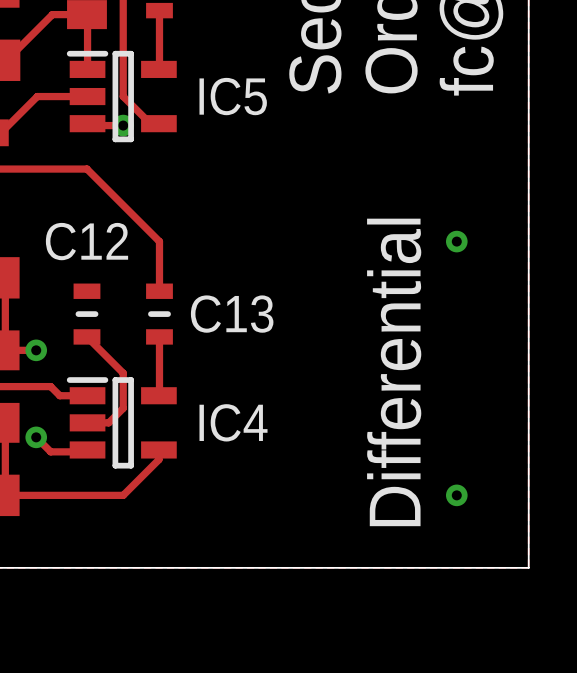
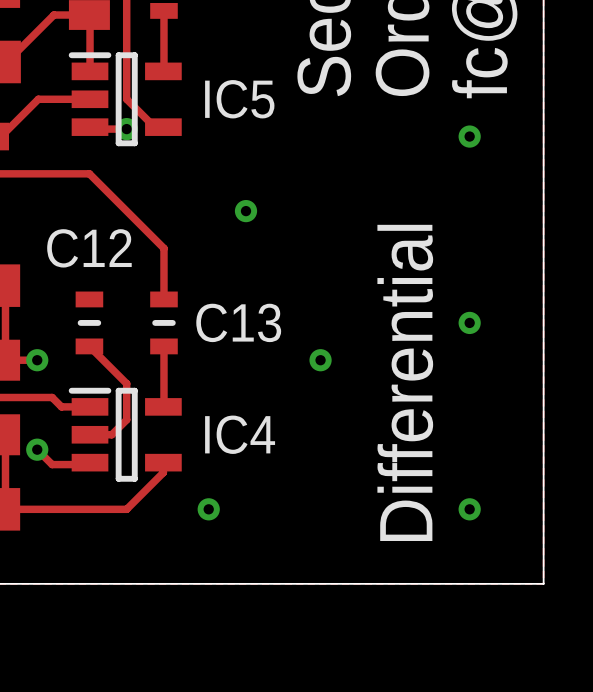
via: none -> (469, 136)
via: none -> (246, 211)
via: (456, 241) -> none
via: none -> (469, 322)
via: none -> (320, 360)
via: none -> (208, 509)

